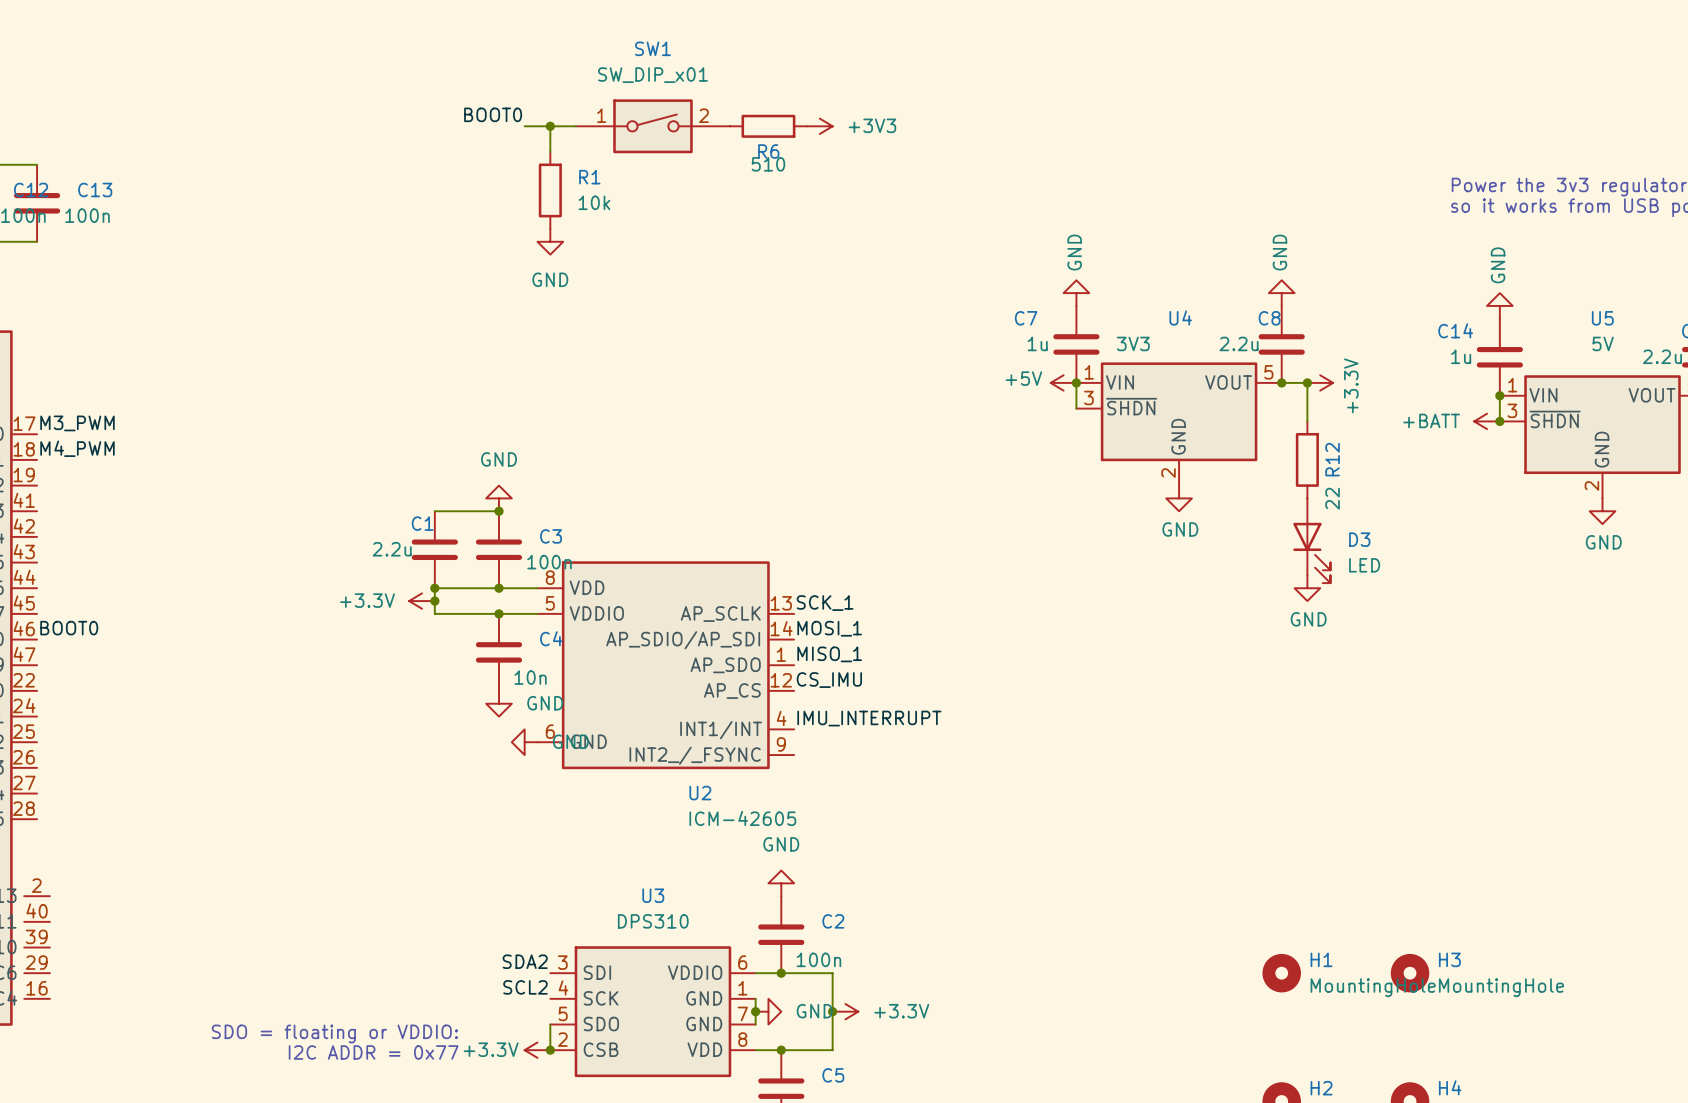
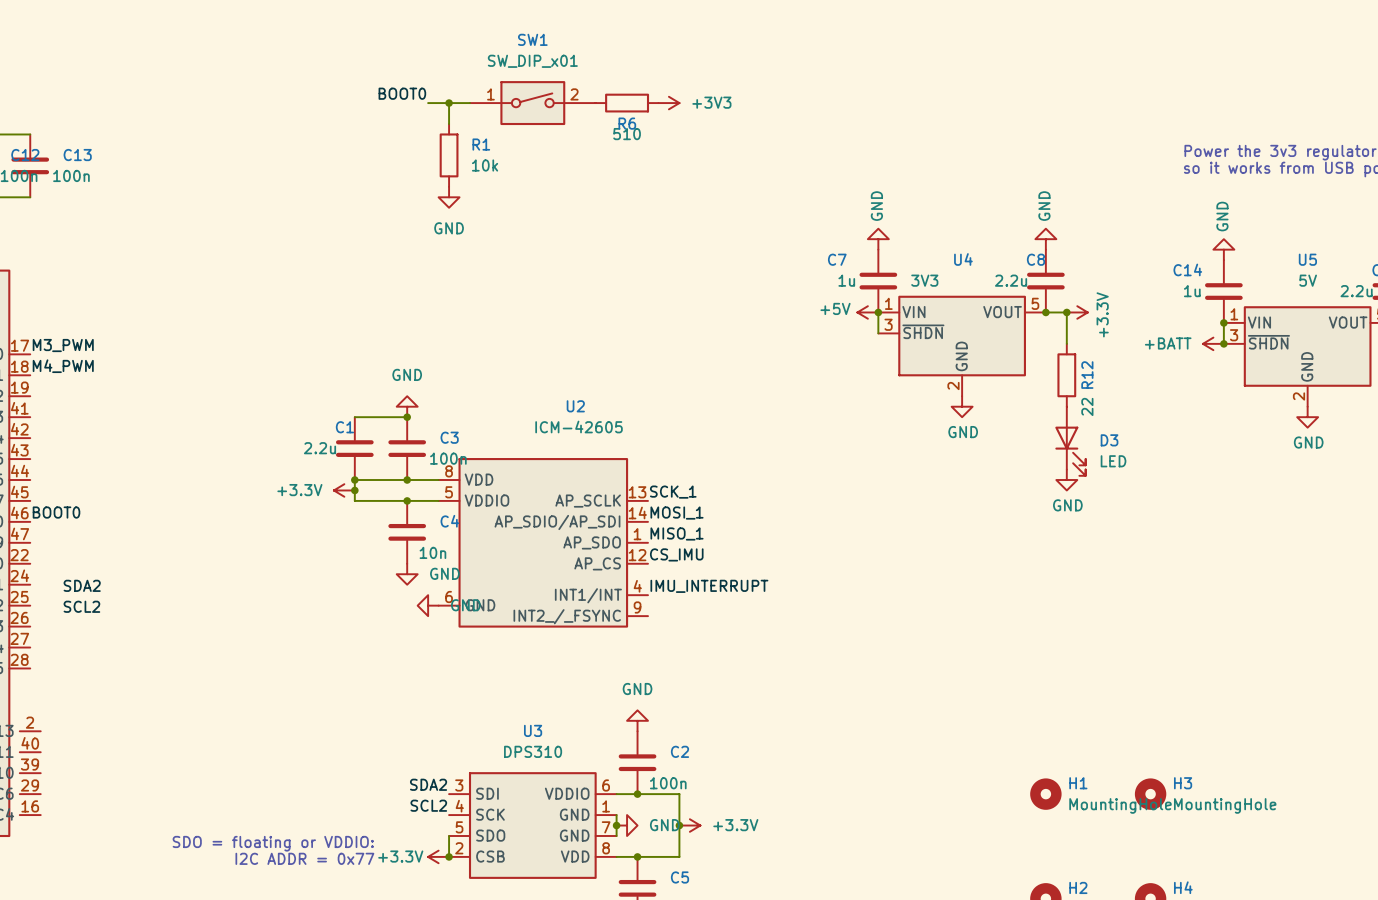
label: none -> SDA2 (82, 585)
label: none -> SCL2 (81, 606)
U2 name position: U2 (700, 793) -> U2 (575, 406)
U2 value position: ICM-42605 (742, 818) -> ICM-42605 (579, 427)

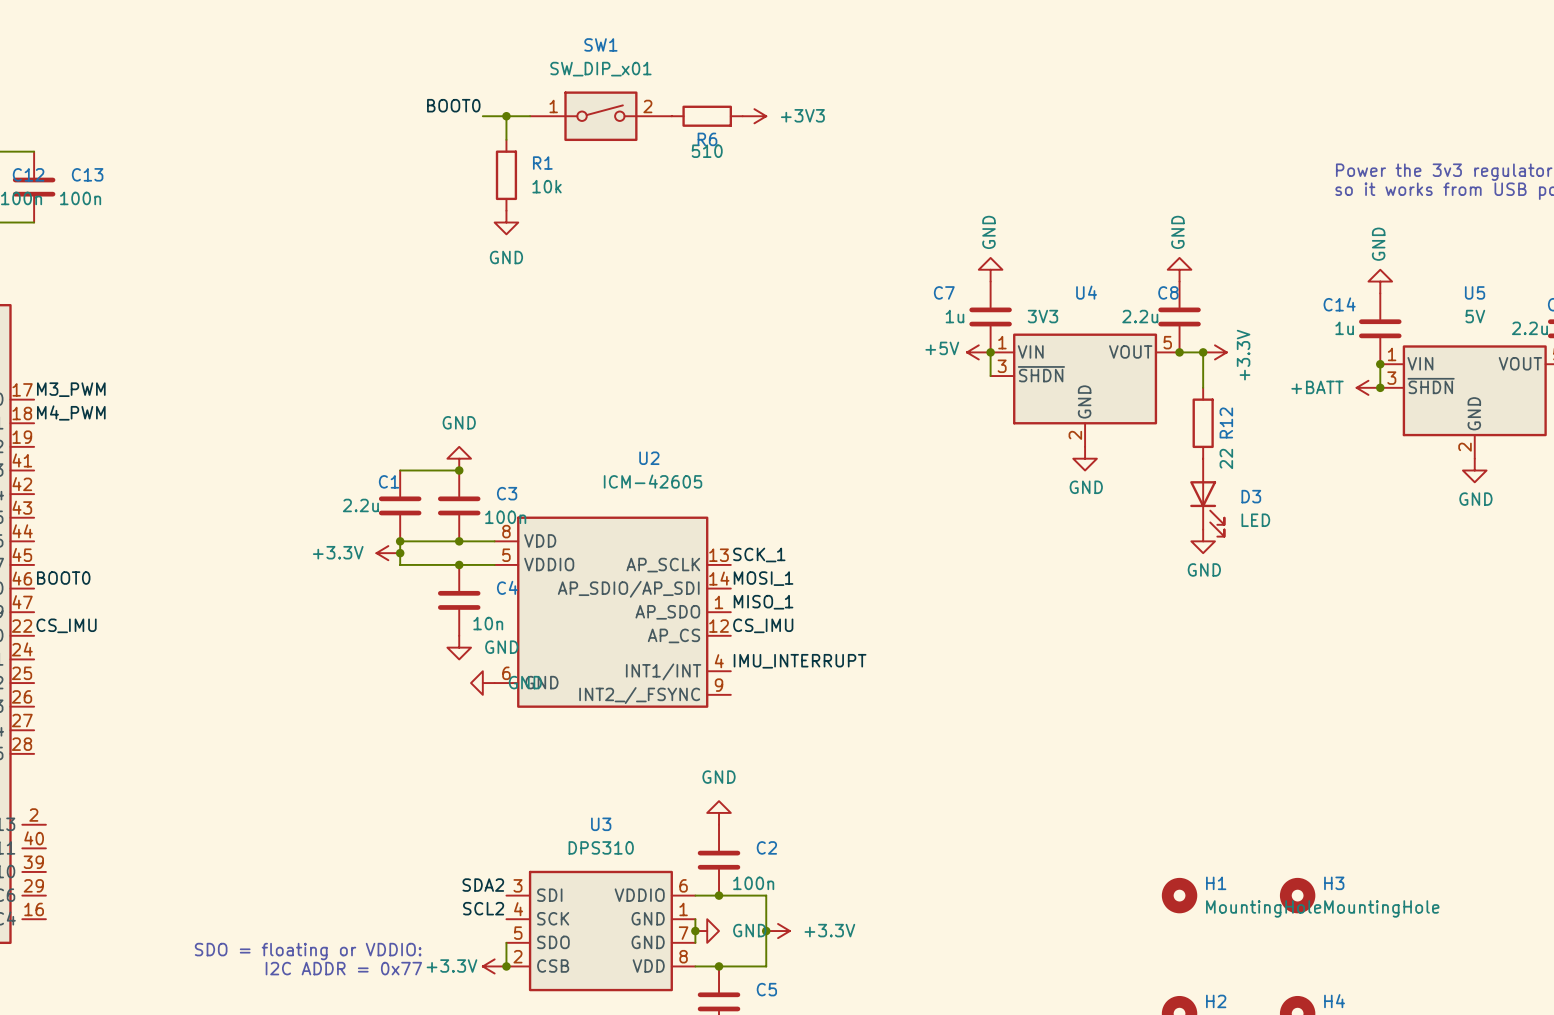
label: none -> CS_IMU (66, 625)
label: SDA2 (82, 585) -> none
label: SCL2 (81, 606) -> none

